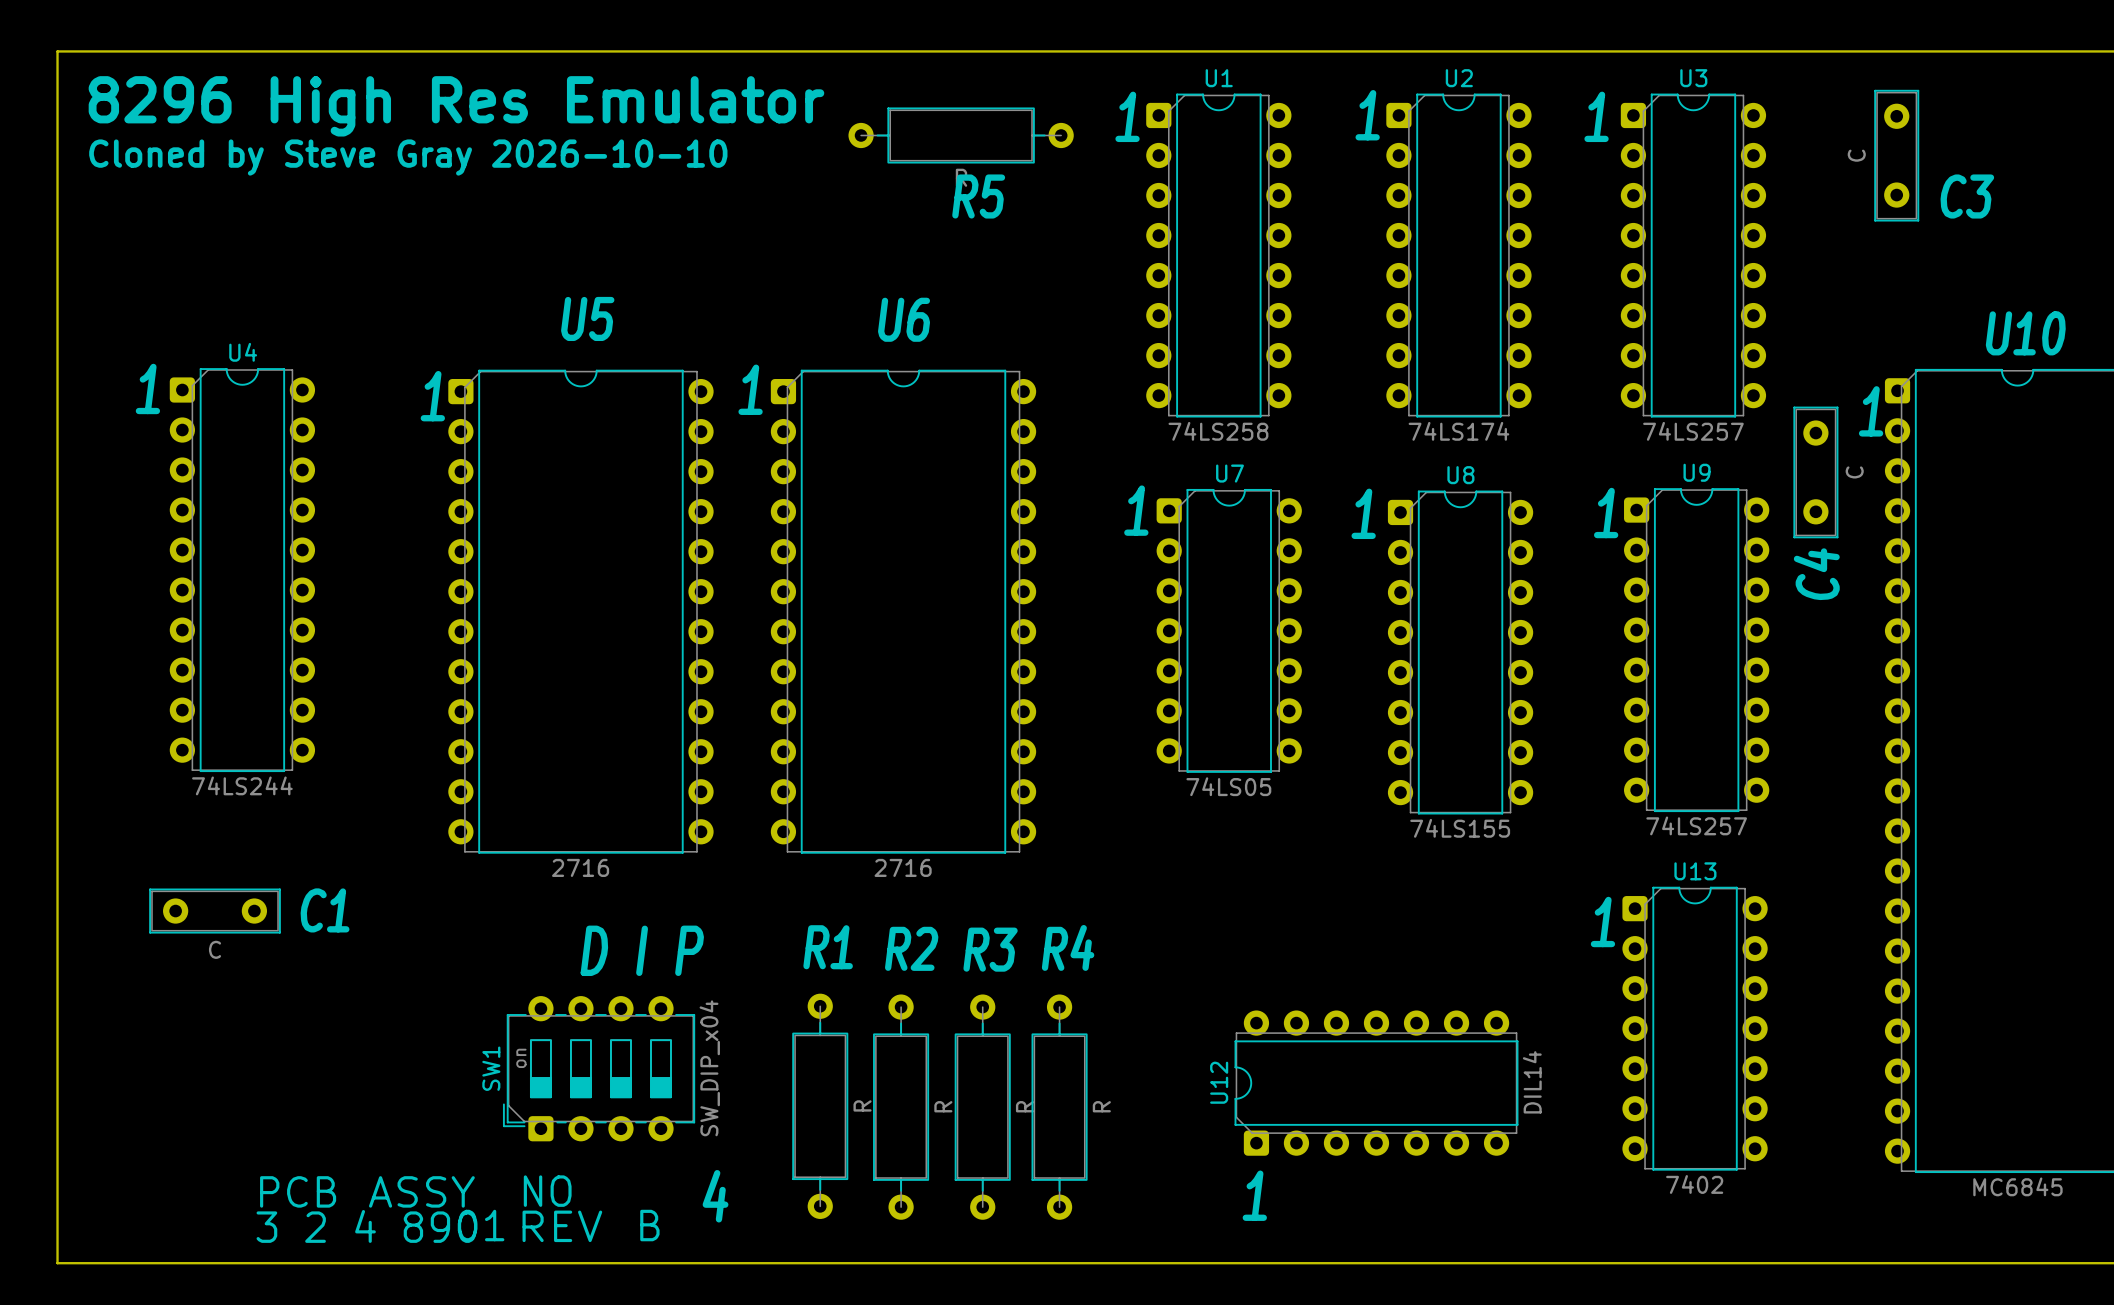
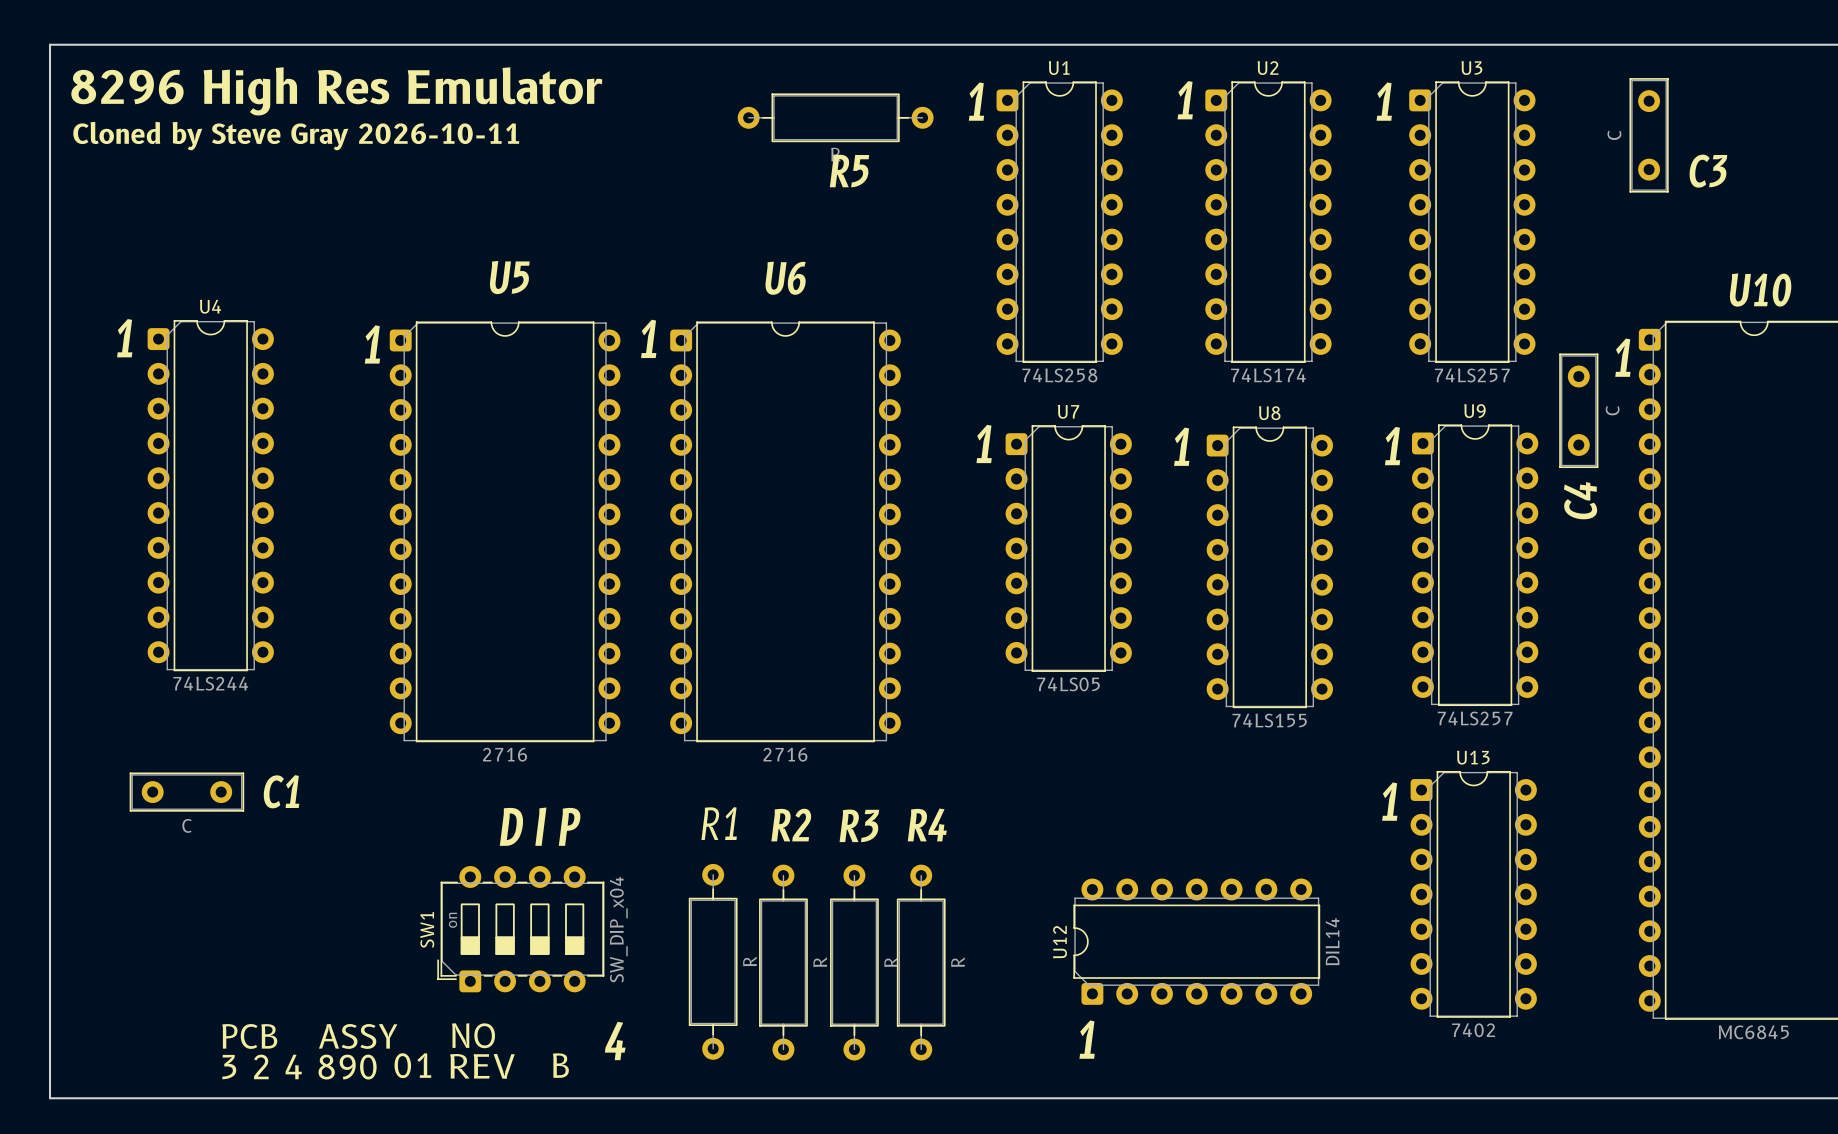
text: Cloned by Steve Gray 2026-10-10 (408, 157) -> Cloned by Steve Gray 2026-10-11 (296, 136)

